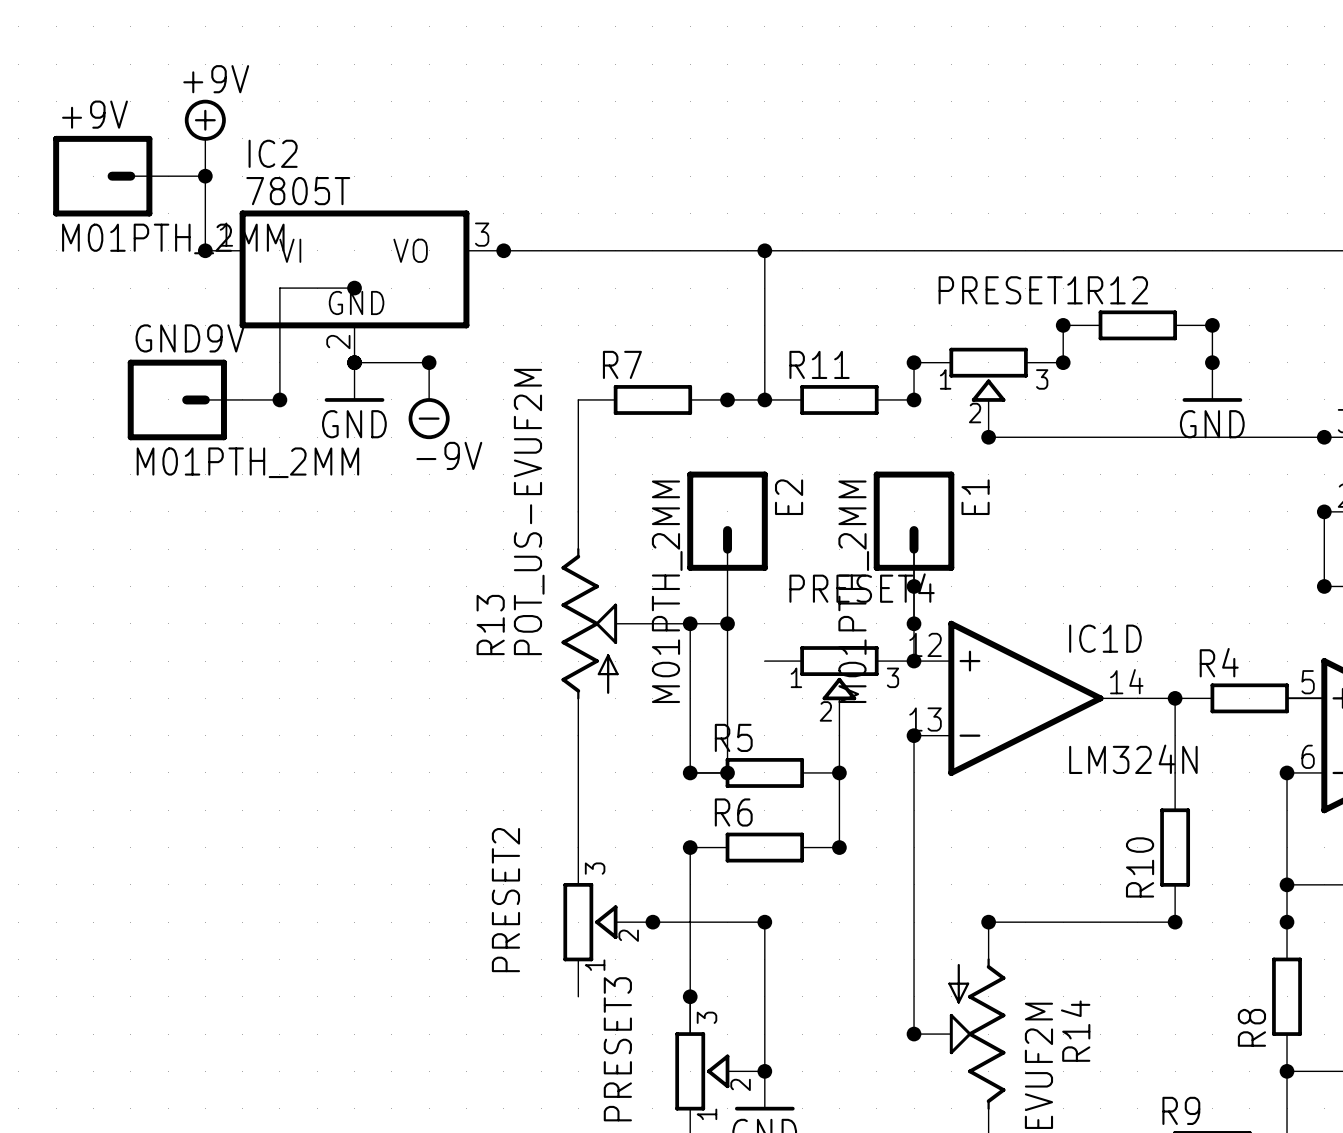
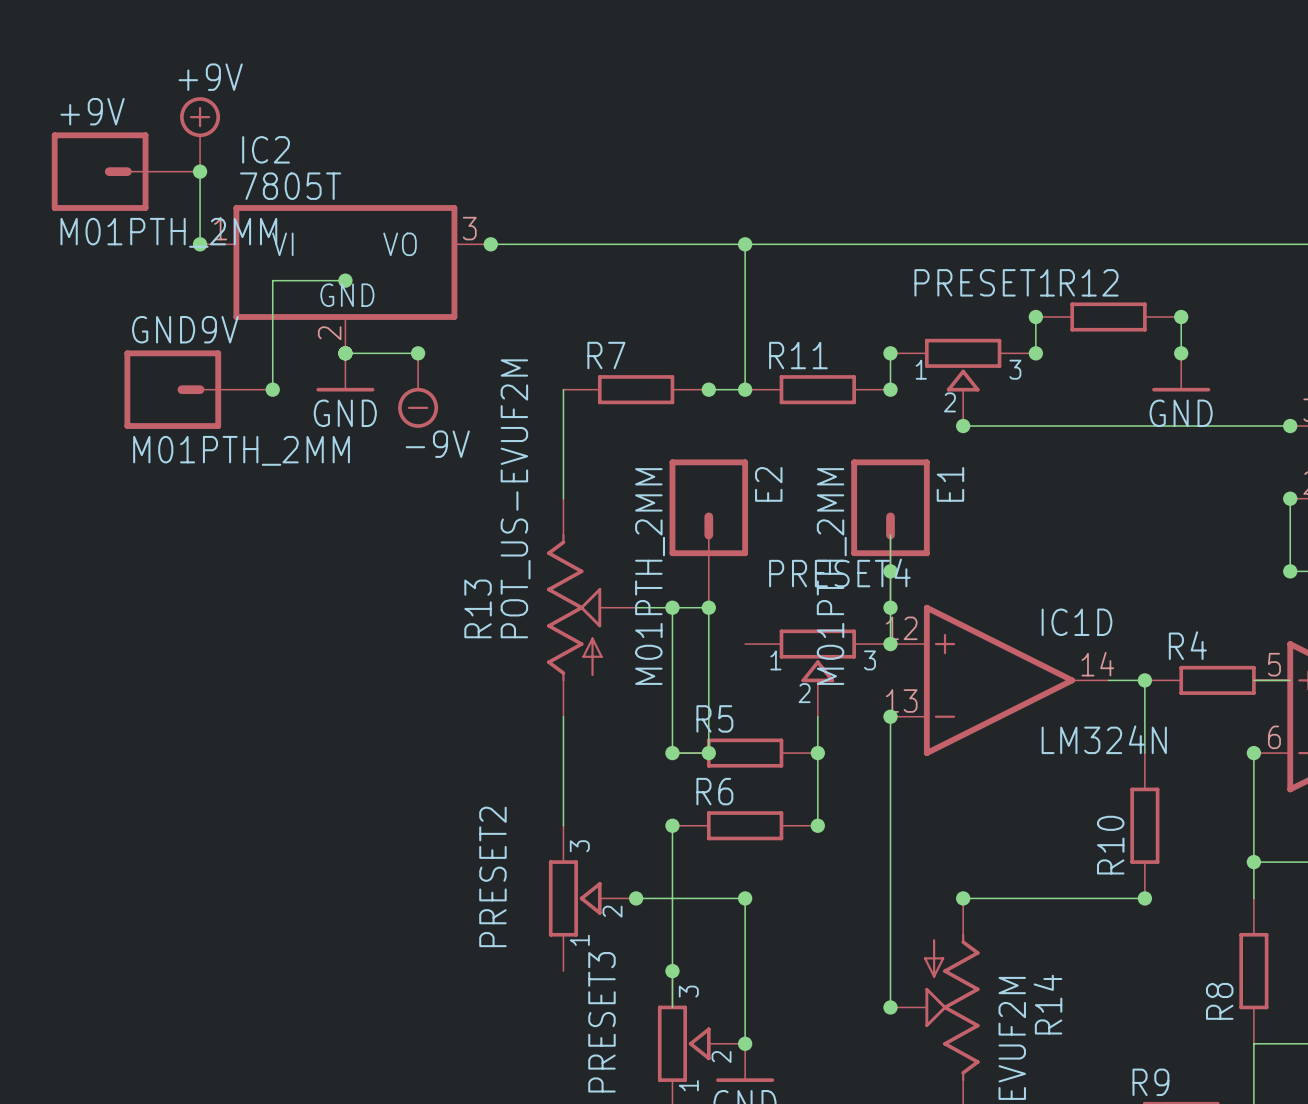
junction: (1287, 922) -> none
junction: (1287, 1071) -> none

